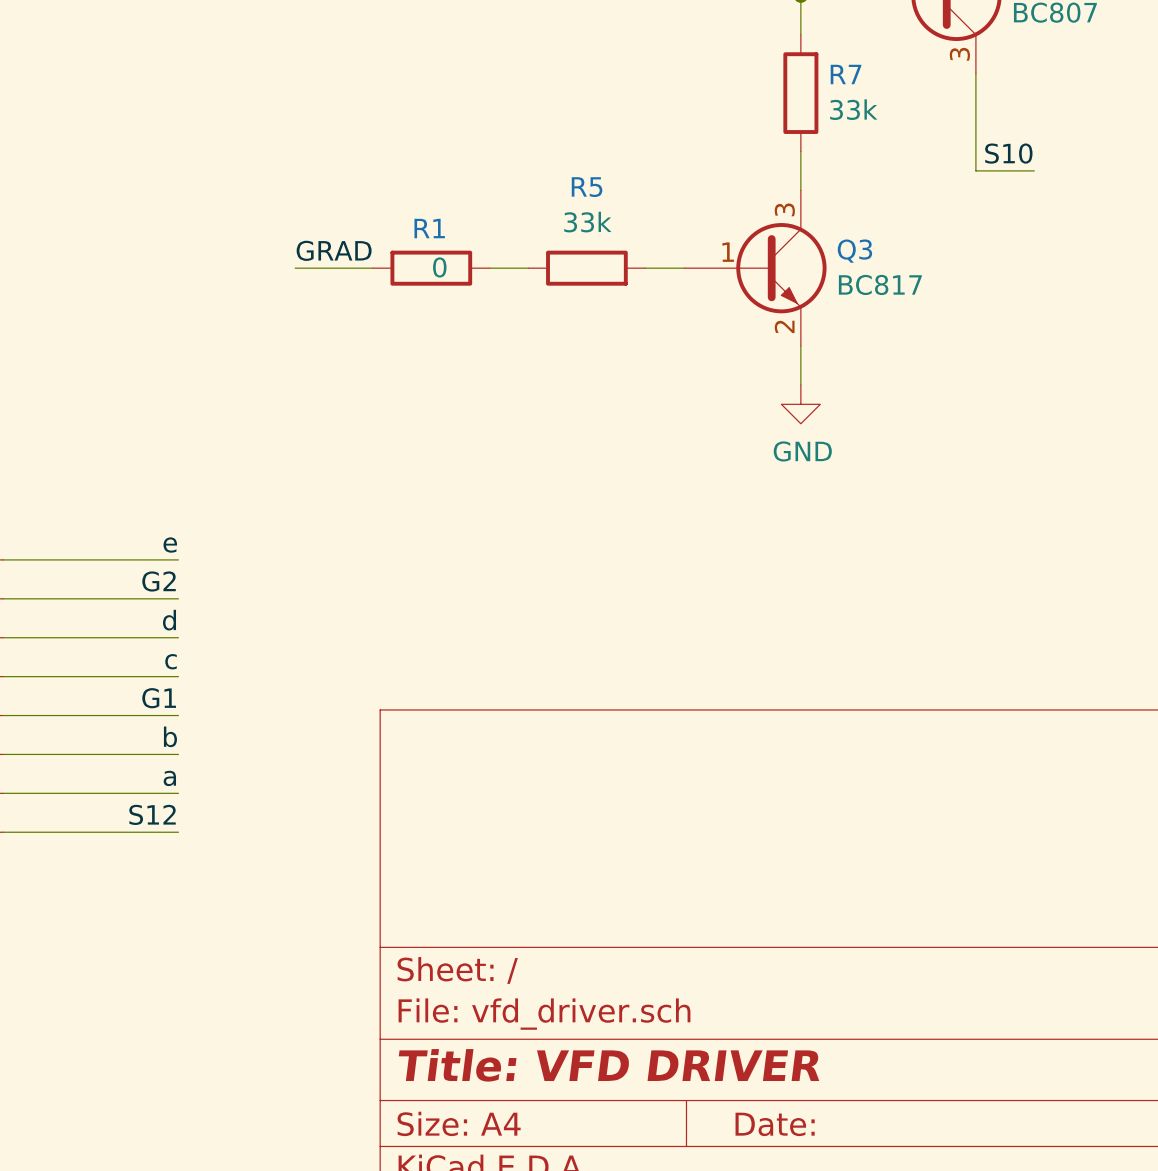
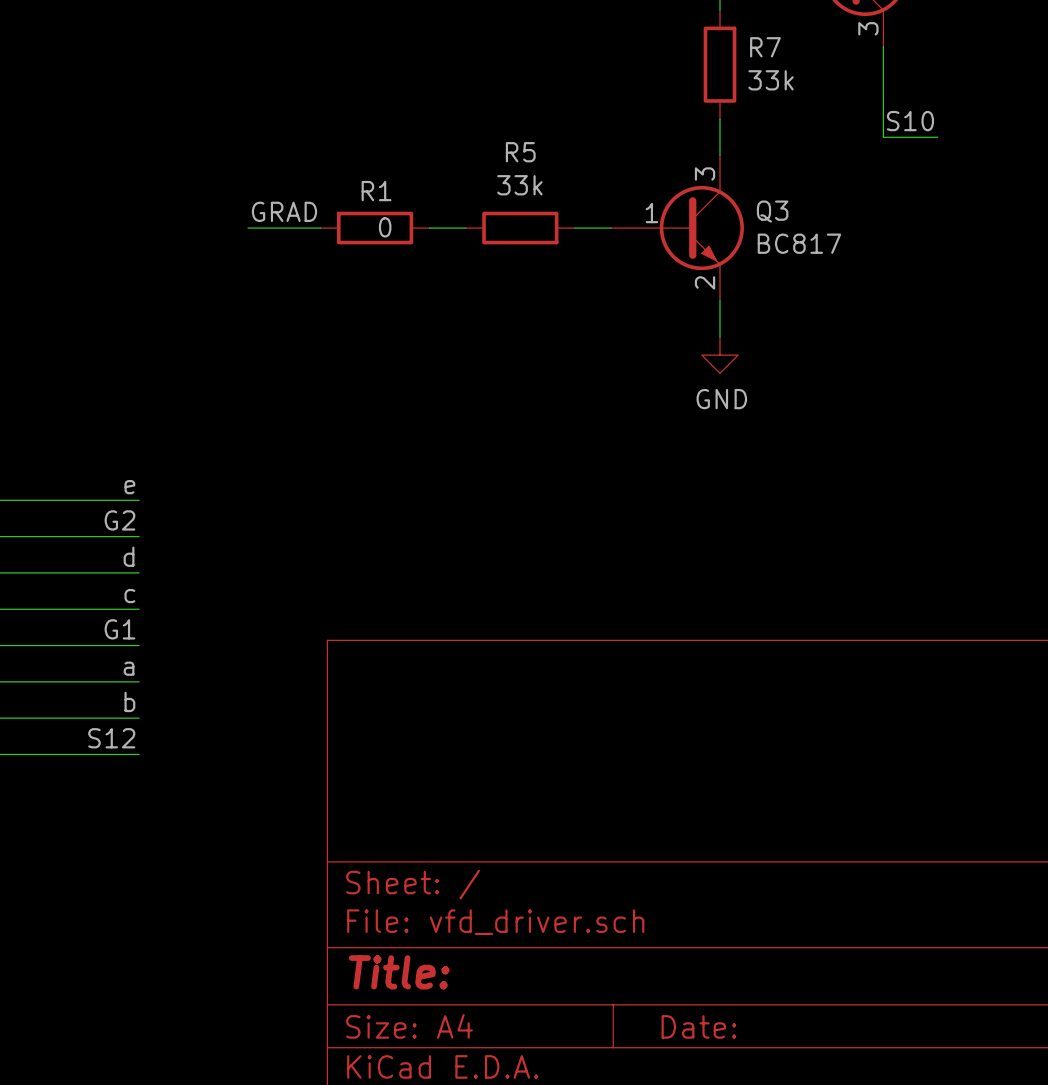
label: b (170, 736) -> a (129, 668)
label: a (169, 778) -> b (129, 701)
title block: Title: VFD DRIVER (609, 1065) -> Title: (399, 972)

